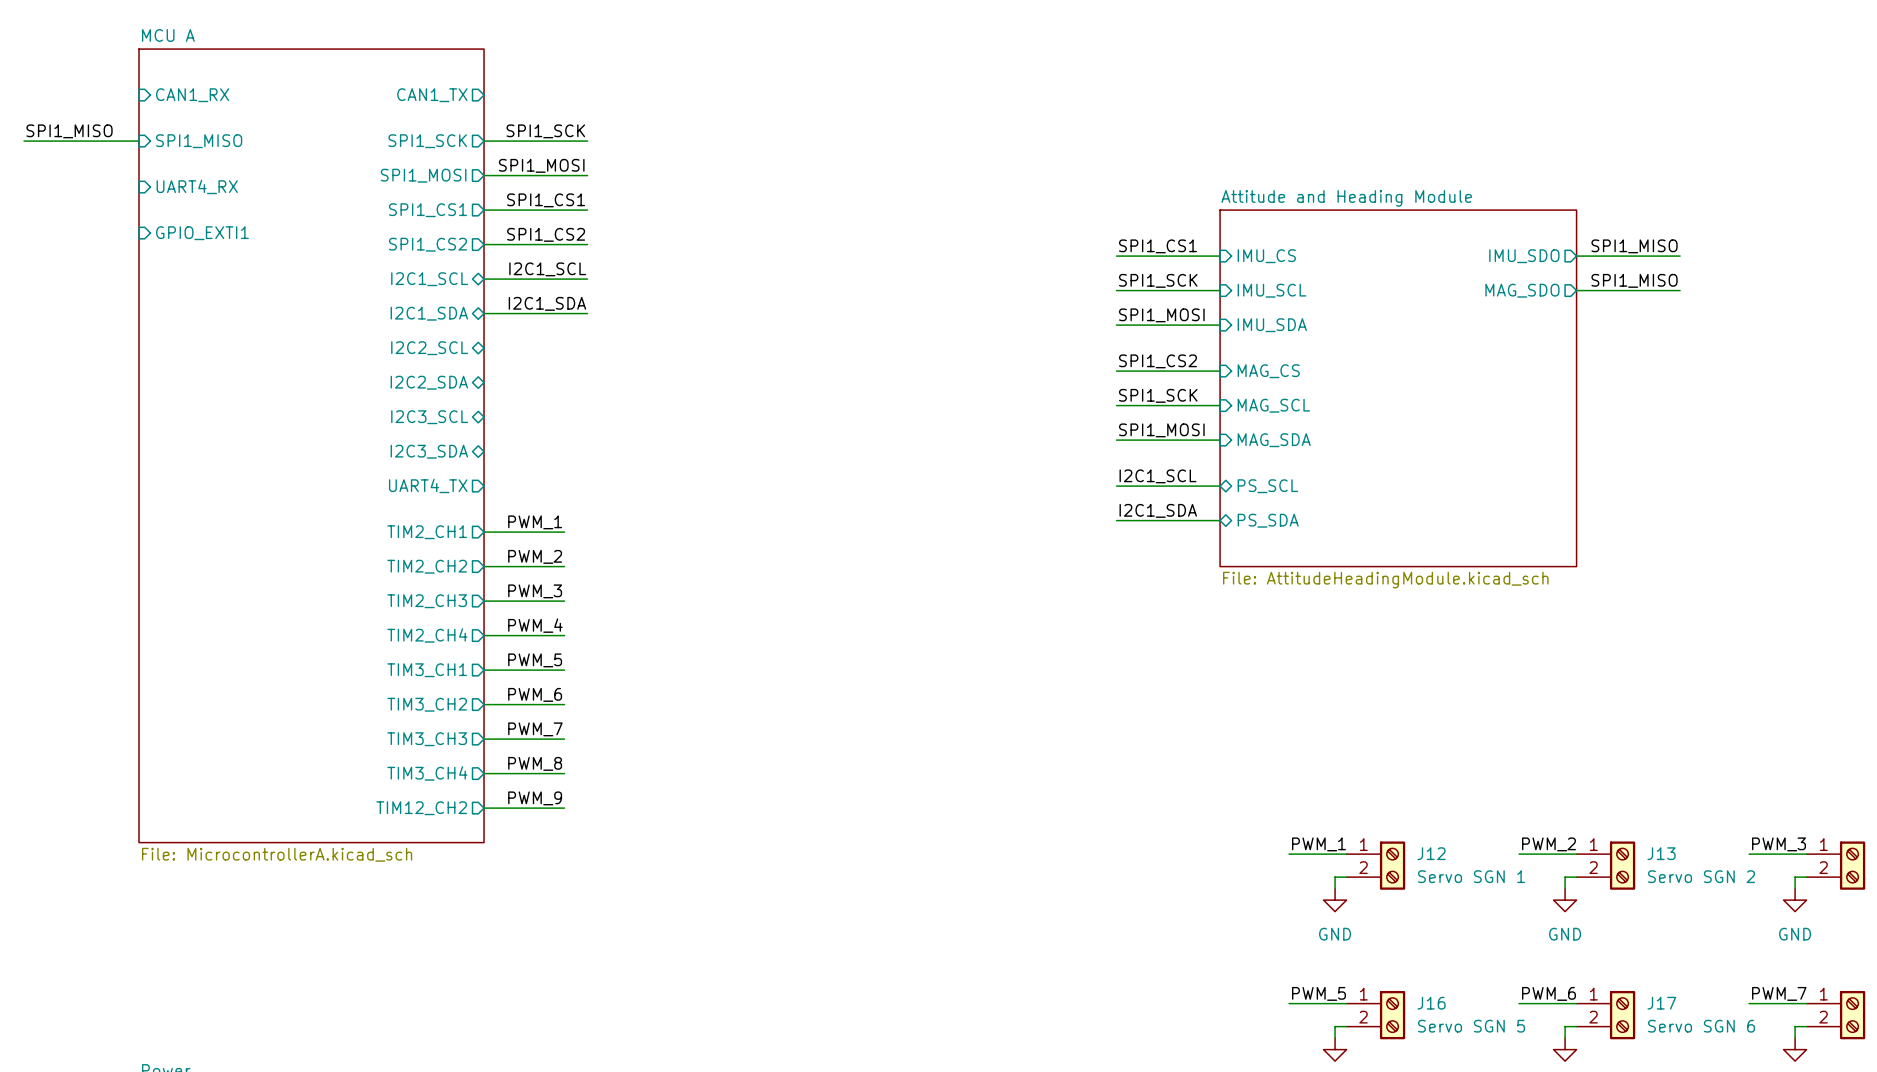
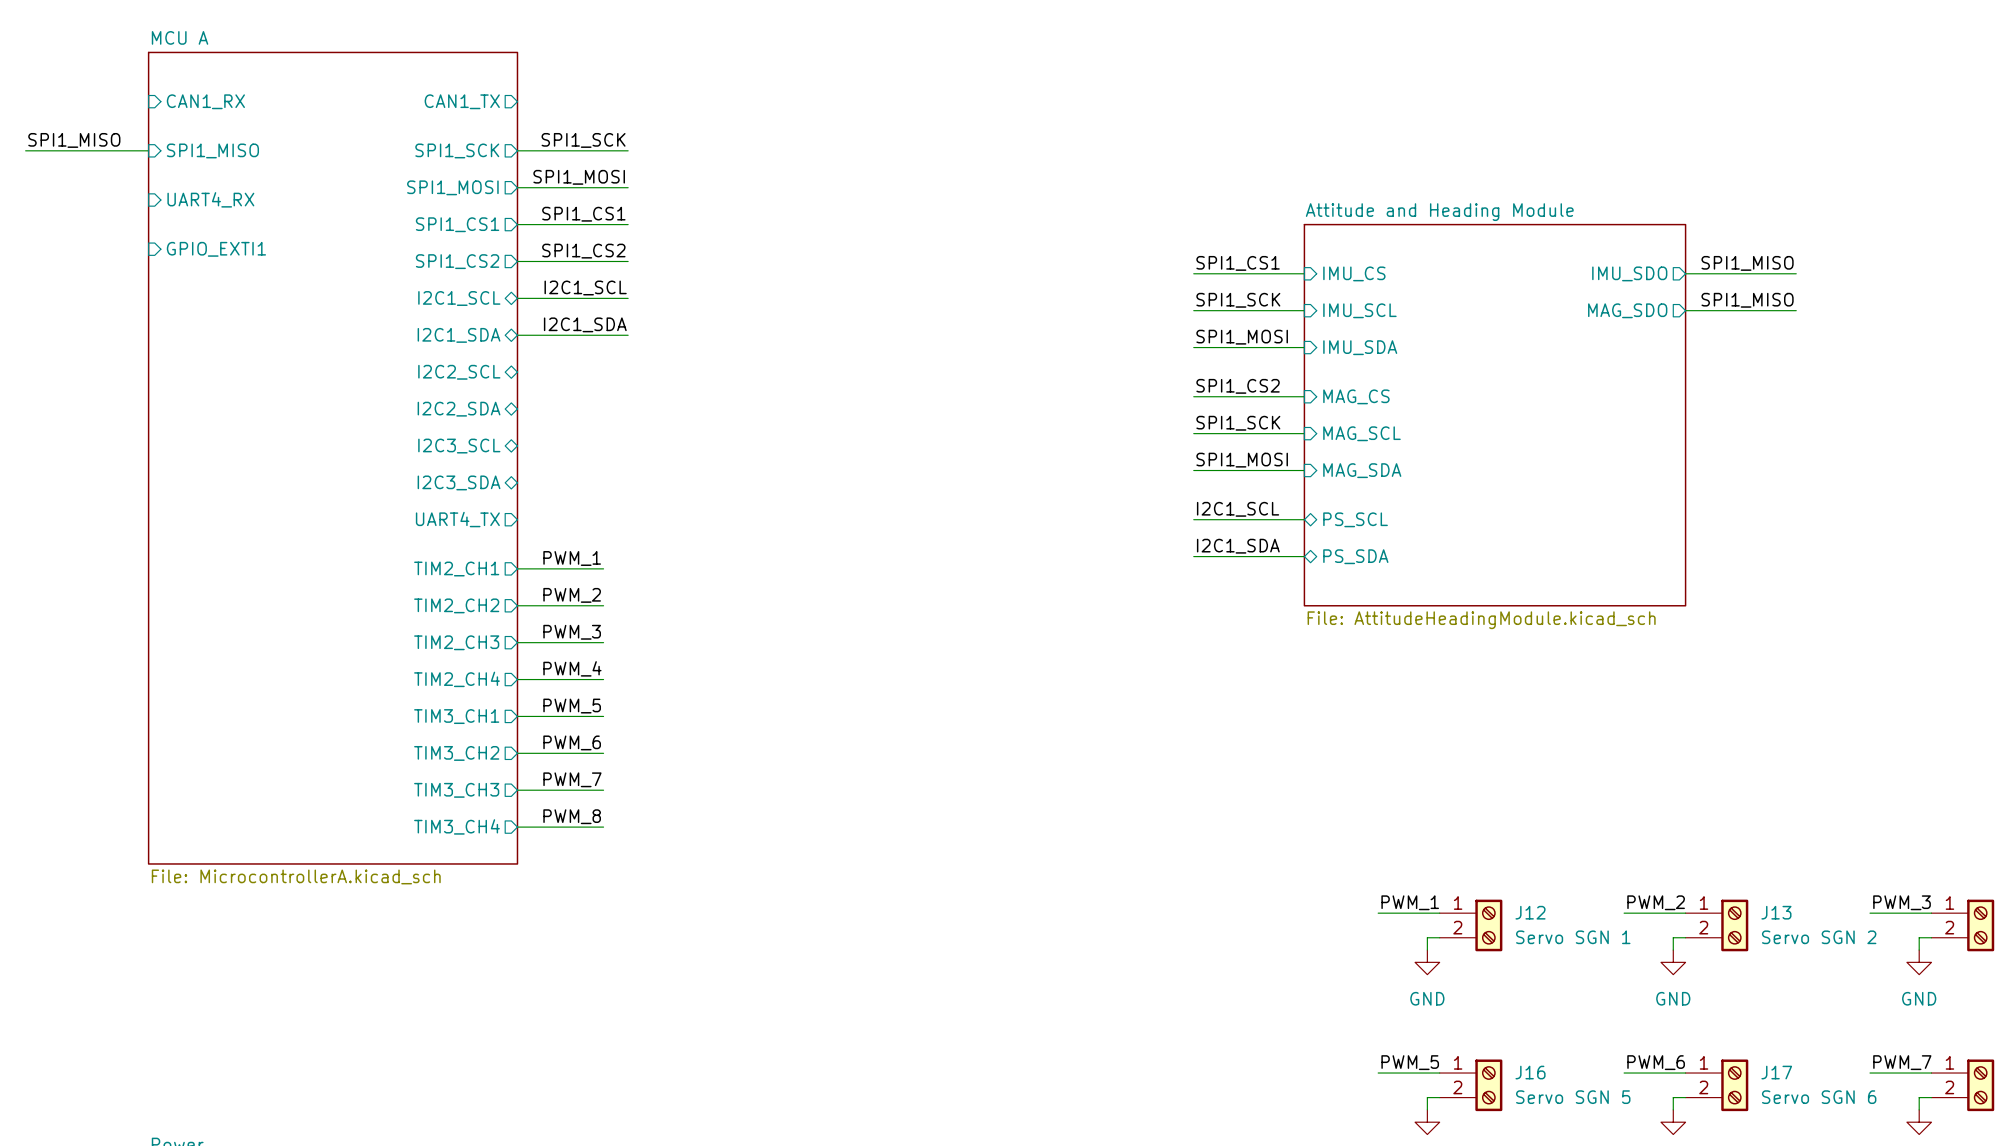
sheet MCU A: none -> File: MicrocontrollerA.kicad_sch (333, 458)
sheet MCU A: File: MicrocontrollerA.kicad_sch (311, 445) -> none
label: PWM_9 (535, 798) -> none
sheet pin: TIM12_CH2 (421, 808) -> none
wire: (484, 808) (564, 808) -> none

